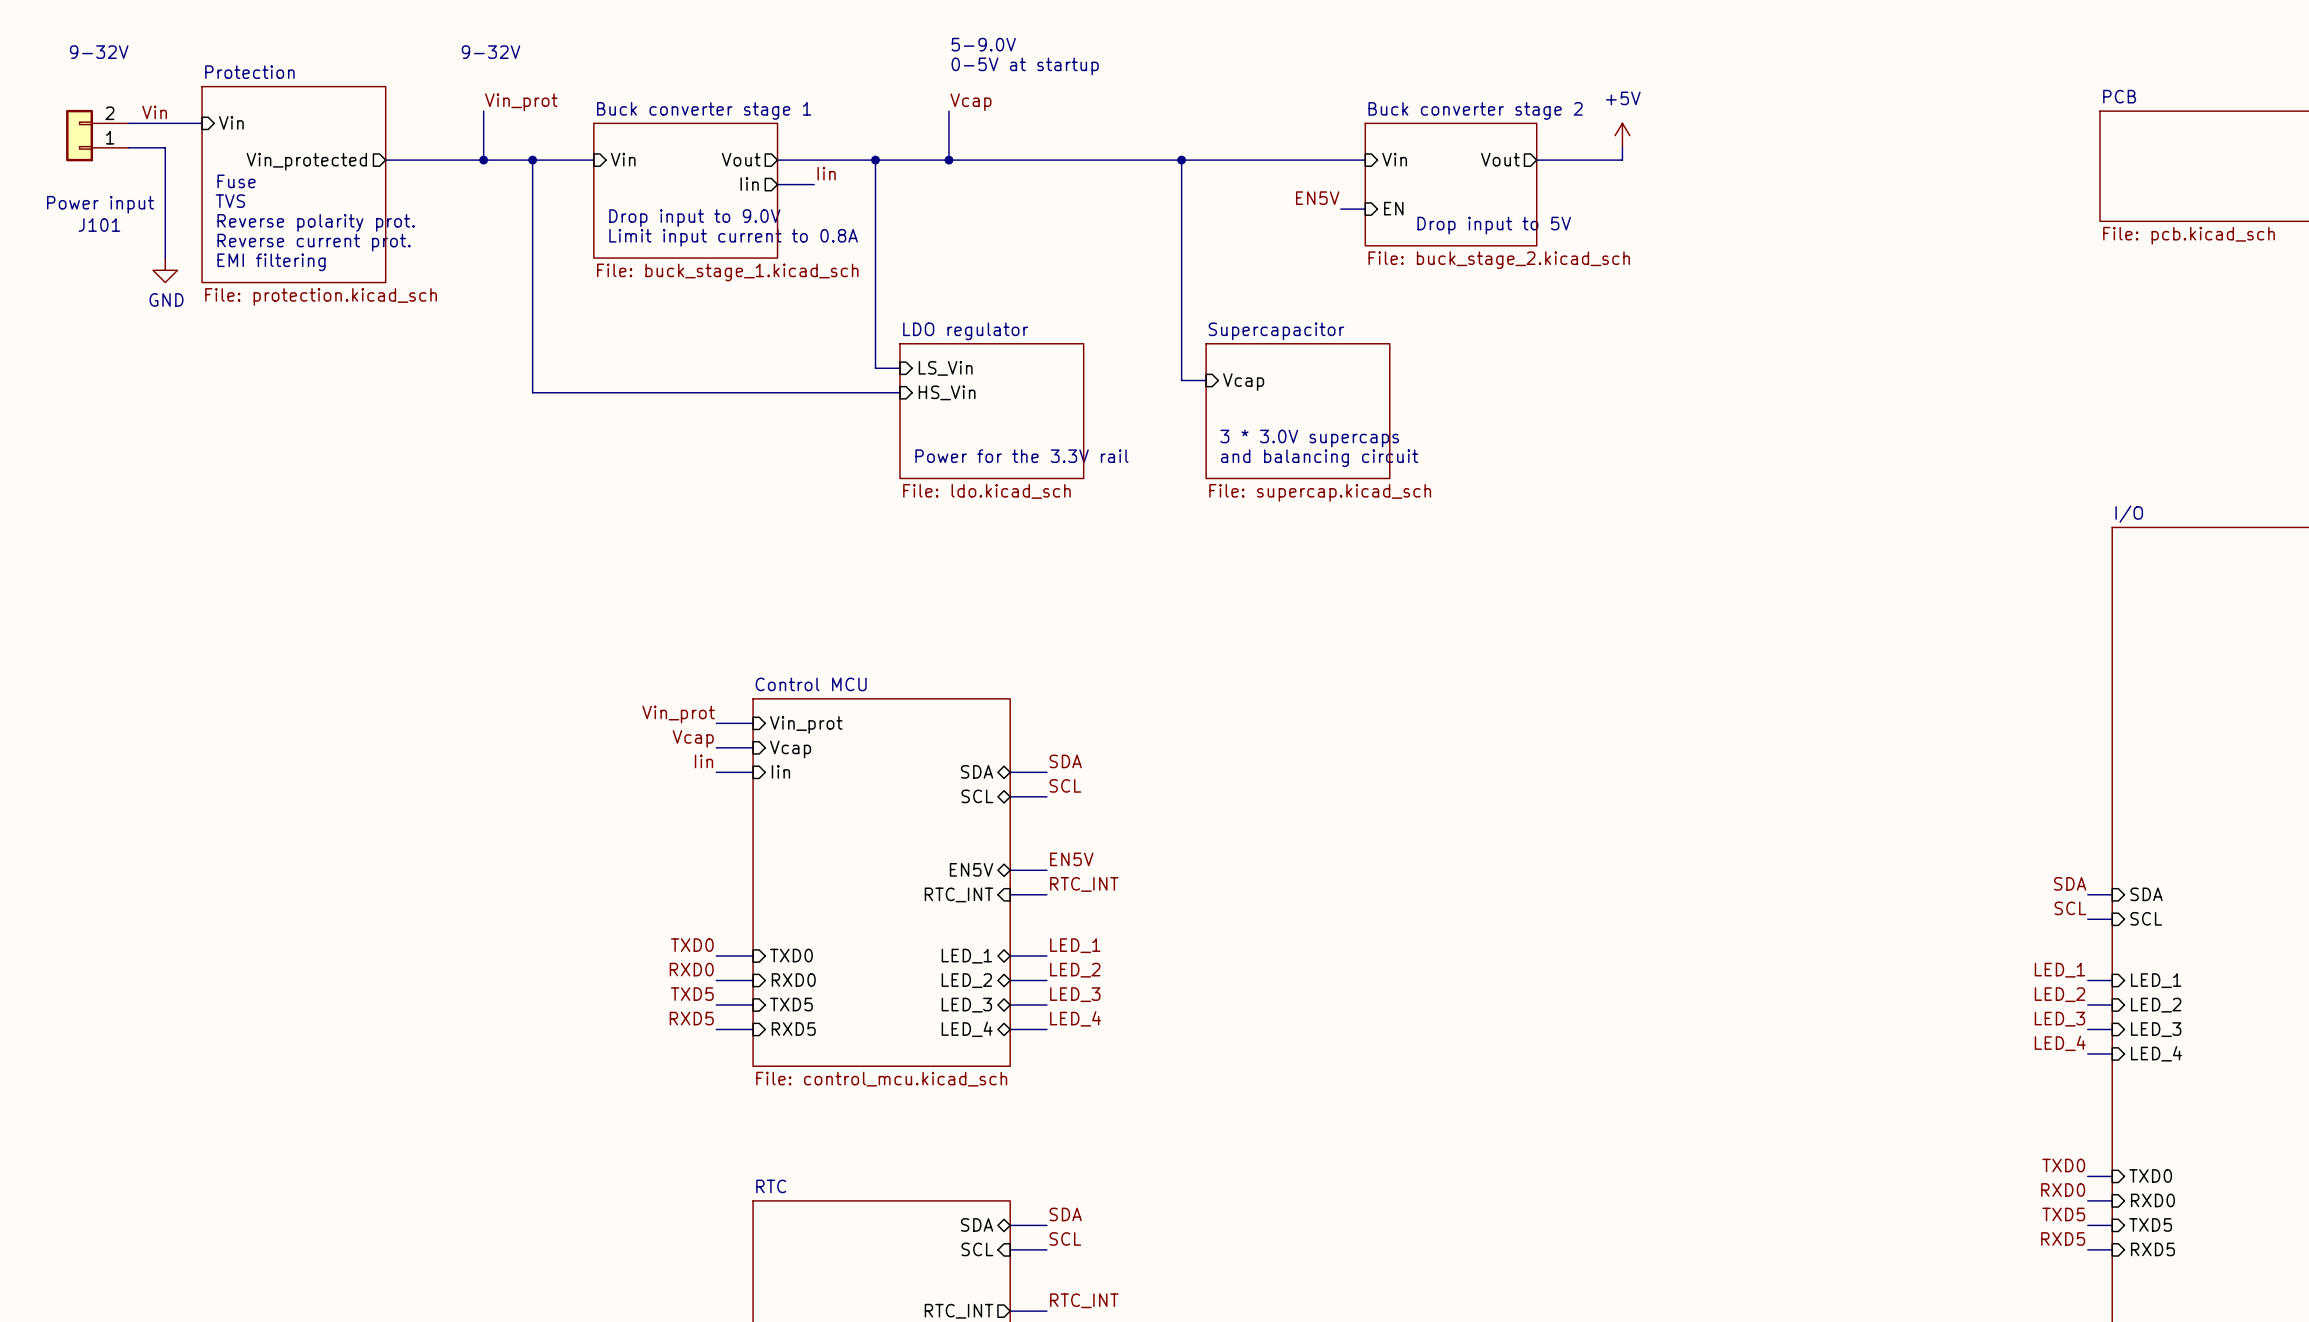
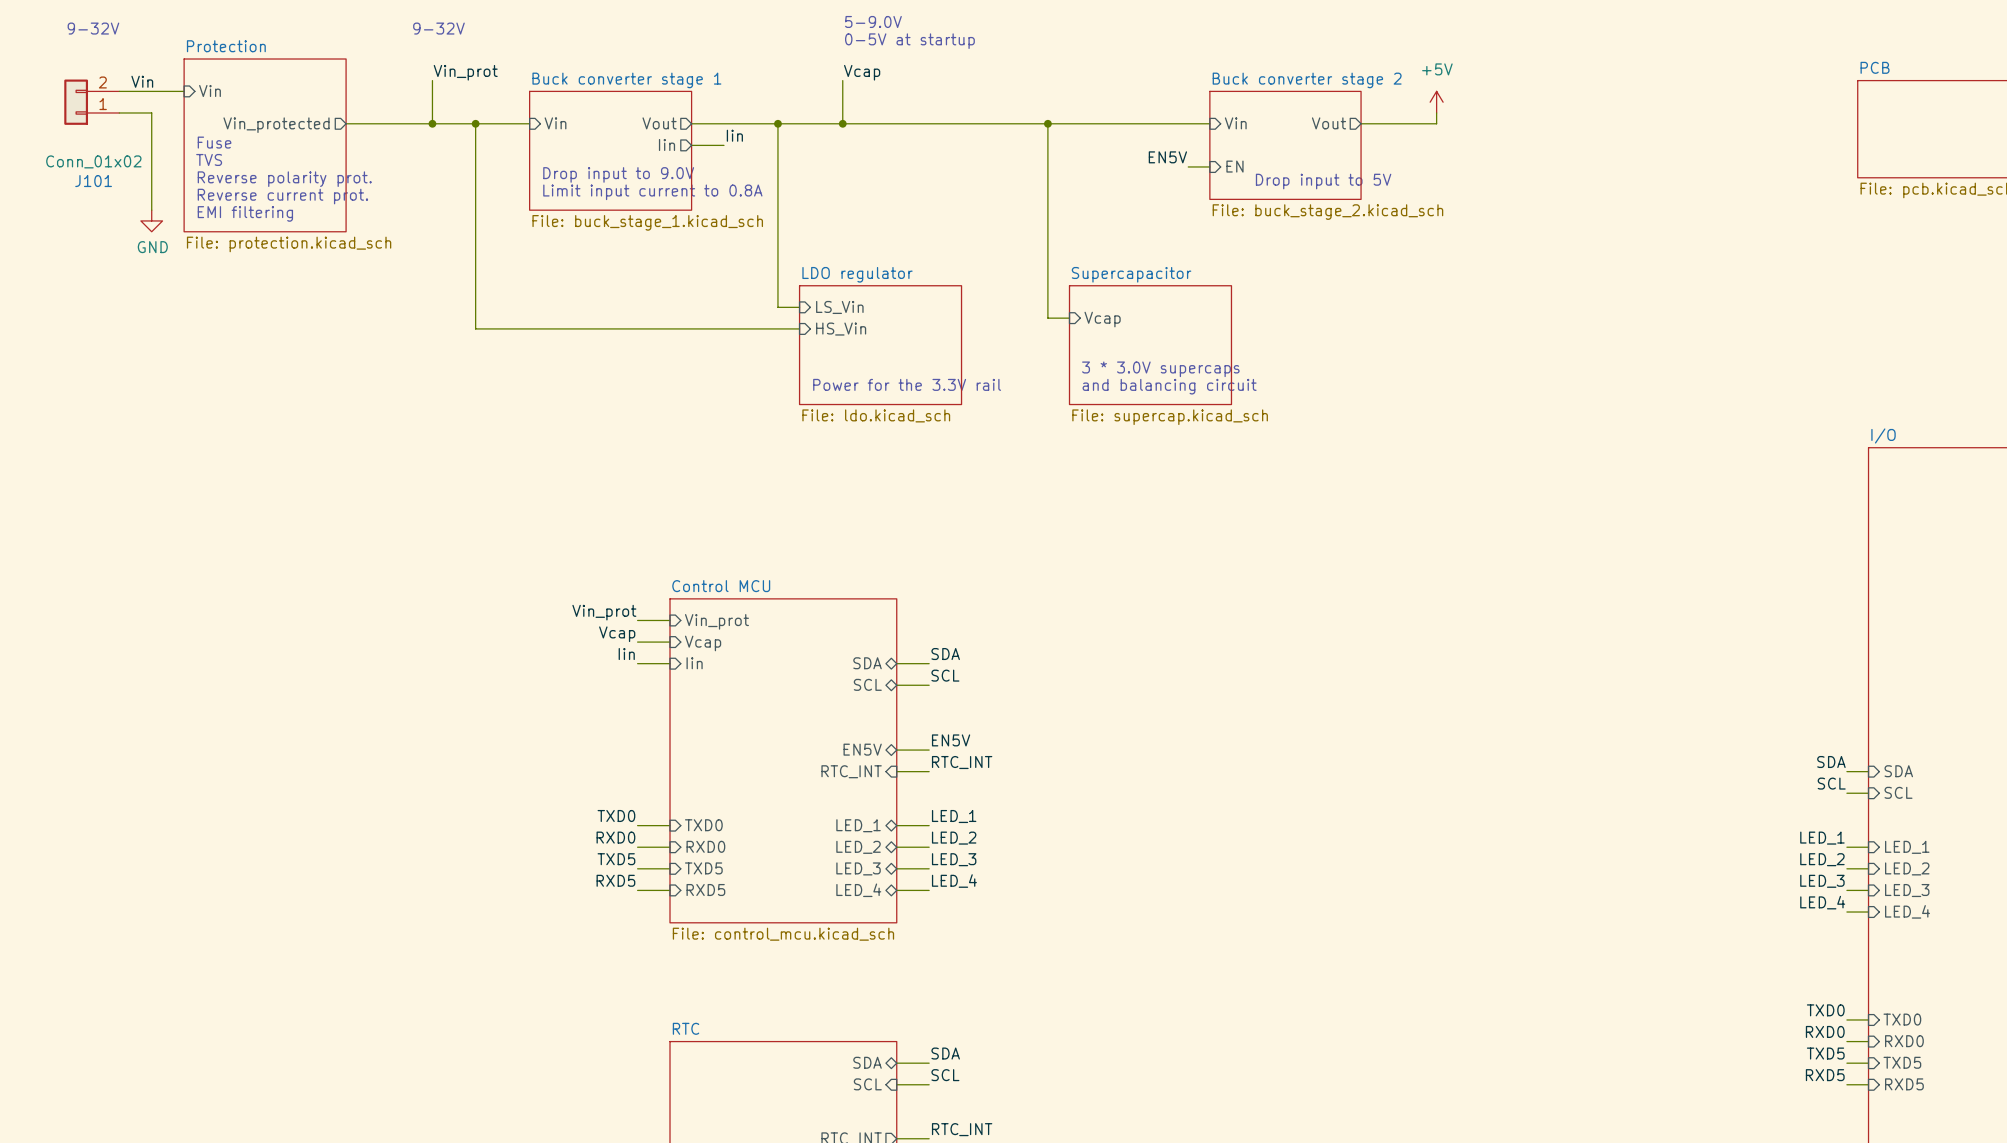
J101 value: Power input (100, 204) -> Conn_01x02 (93, 161)

